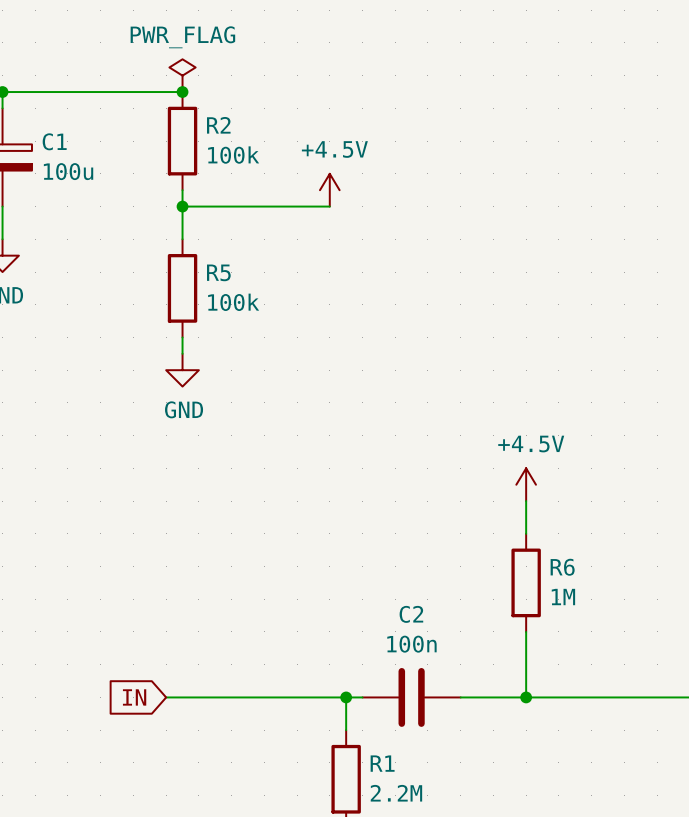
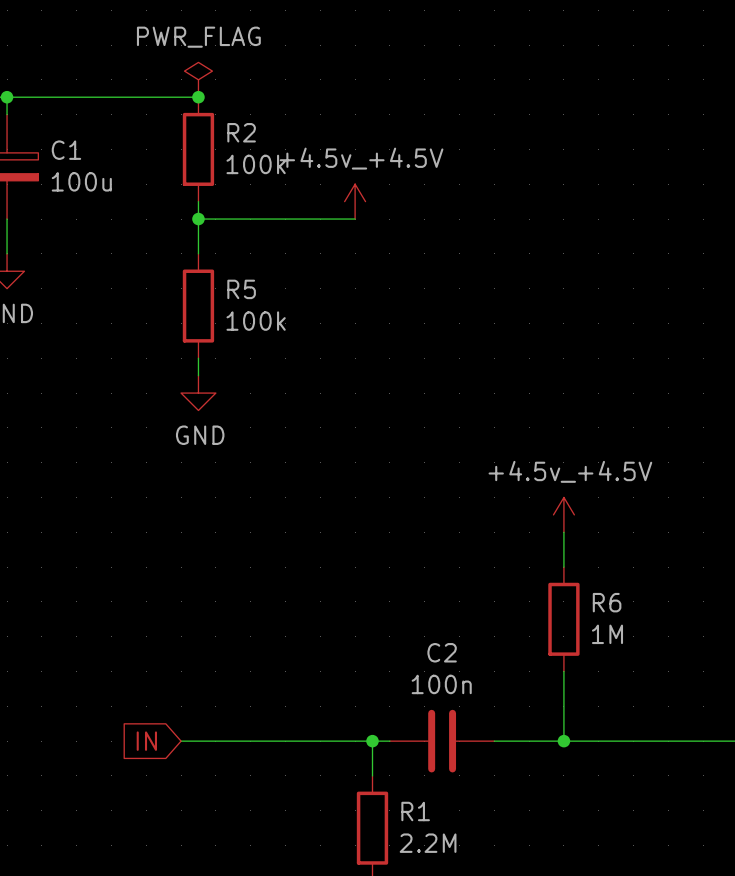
power symbol: +4.5V (329, 190) -> +4.5v_+4.5V (355, 201)
power symbol: +4.5V (526, 484) -> +4.5v_+4.5V (563, 514)

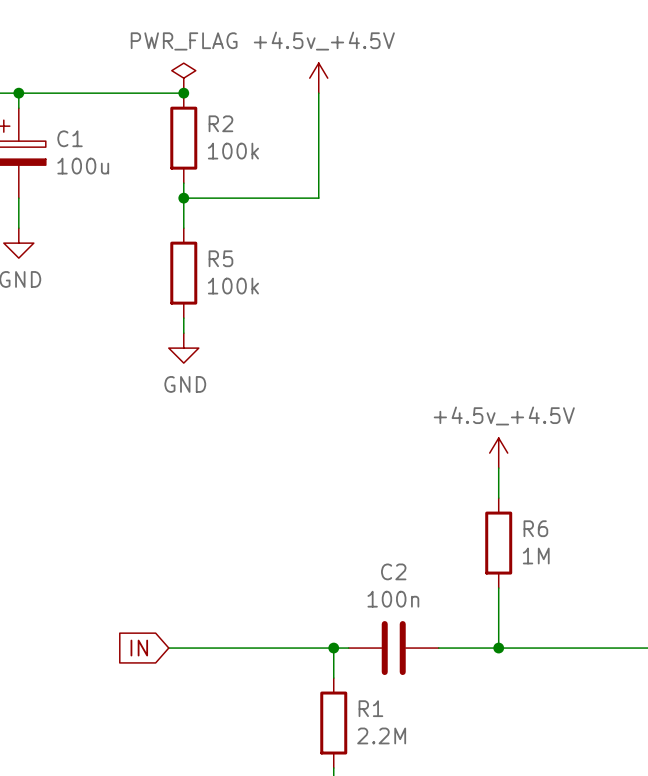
wire: none -> (318, 93) (318, 198)
power symbol position: +4.5v_+4.5V (355, 201) -> +4.5v_+4.5V (318, 78)

